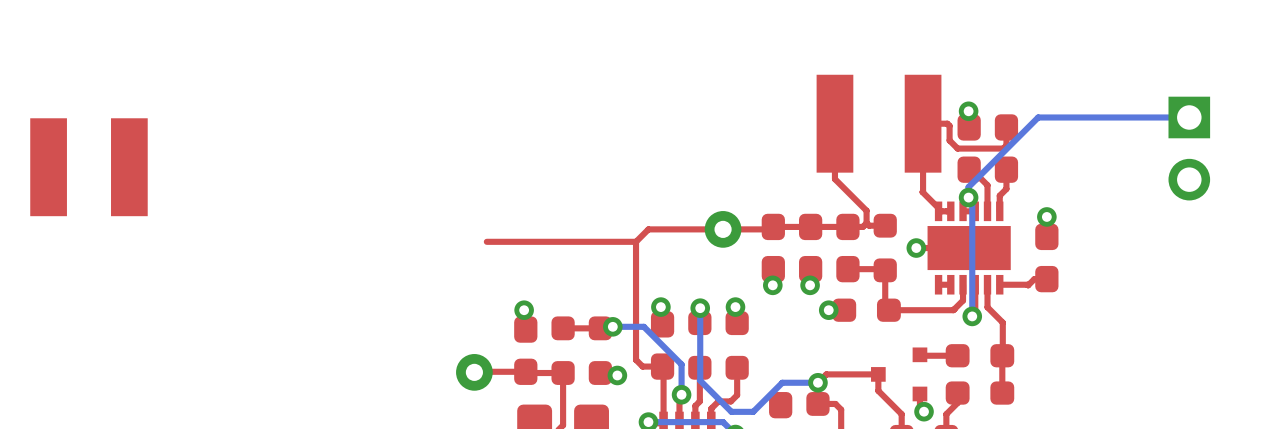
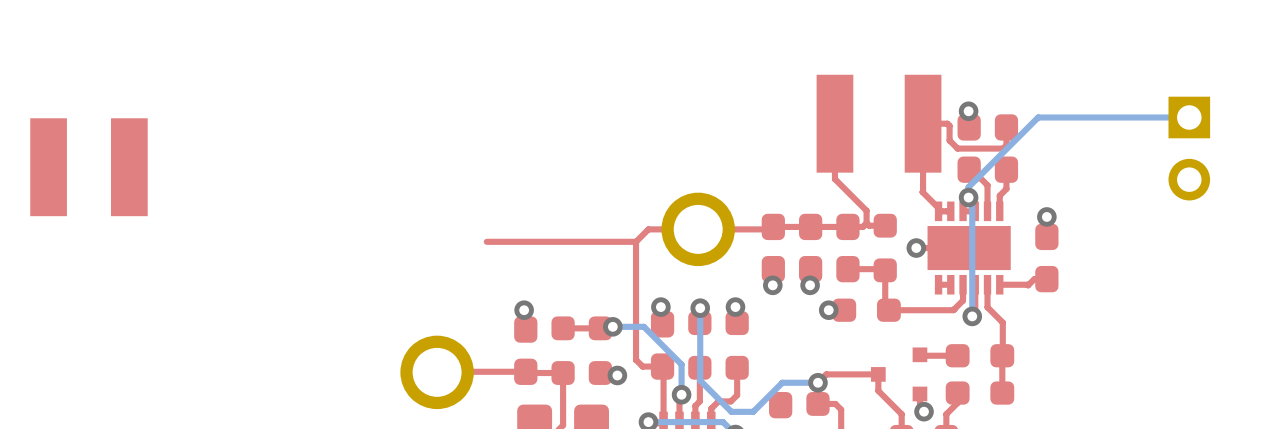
part: none -> (698, 229)
part: (723, 229) -> none
part: none -> (437, 372)
part: (474, 372) -> none

